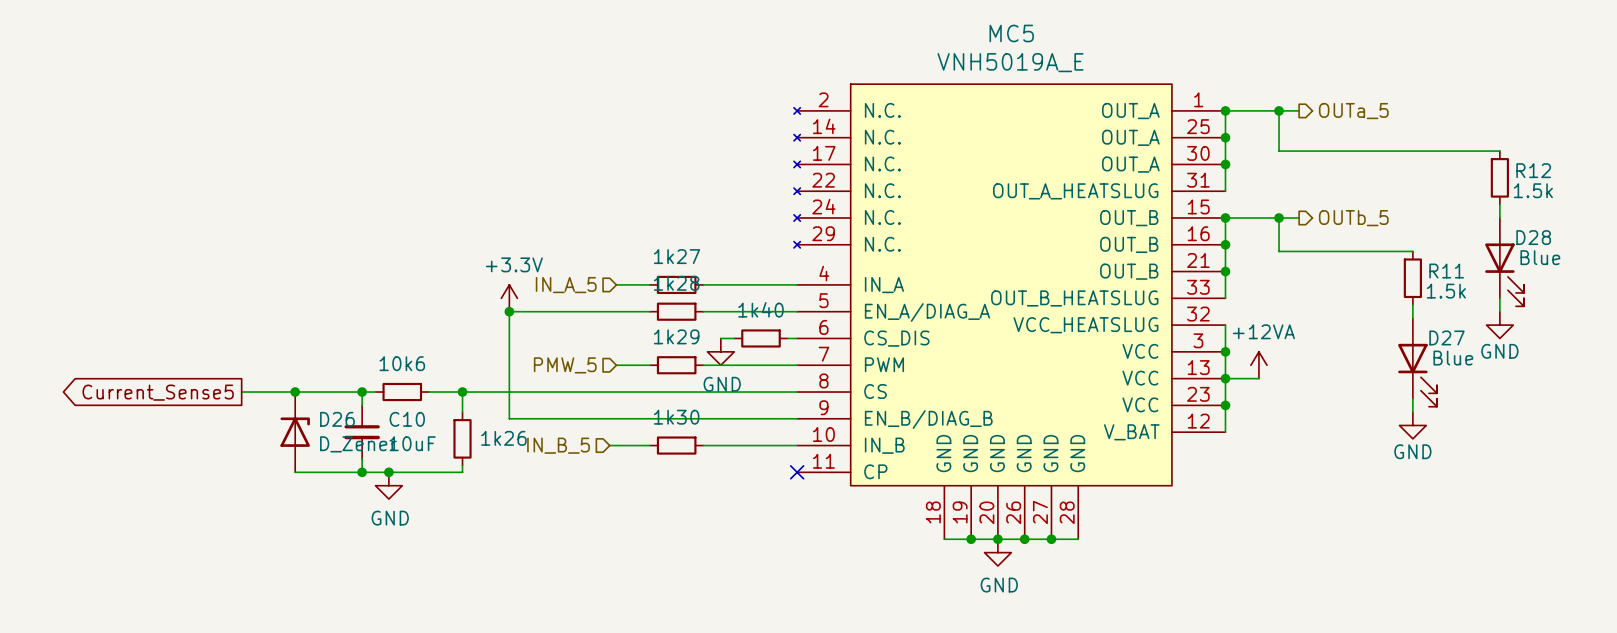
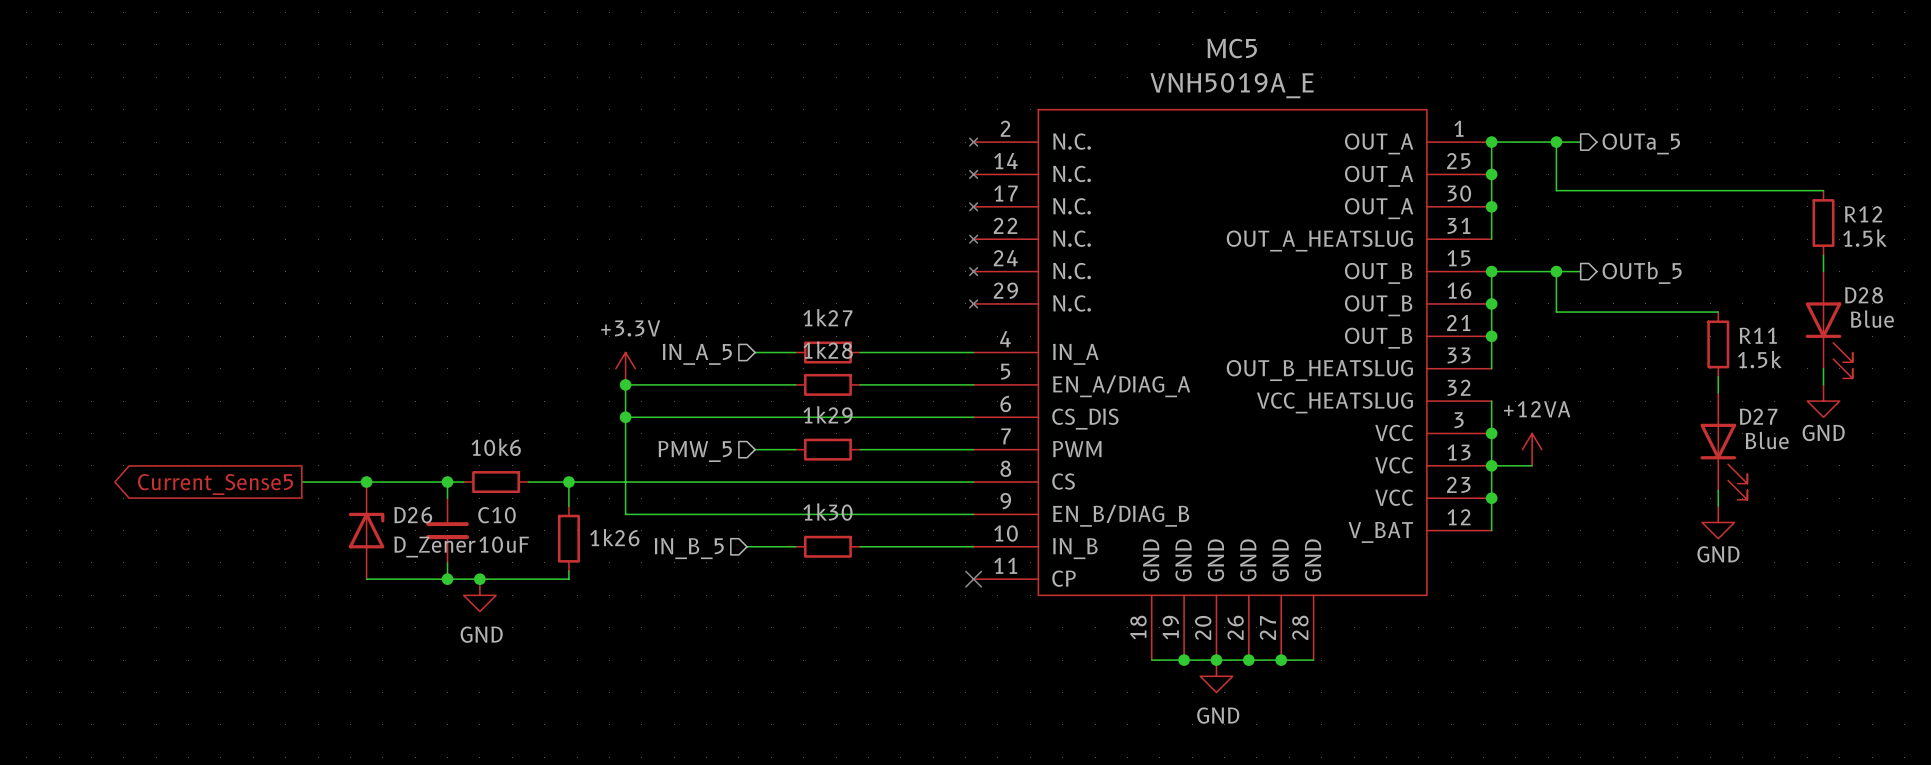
wire: none -> (625, 417) (881, 417)
junction: none -> (625, 417)
wire: none -> (897, 417) (962, 417)
1k40: (761, 338) -> none
power symbol: GND (720, 351) -> none

